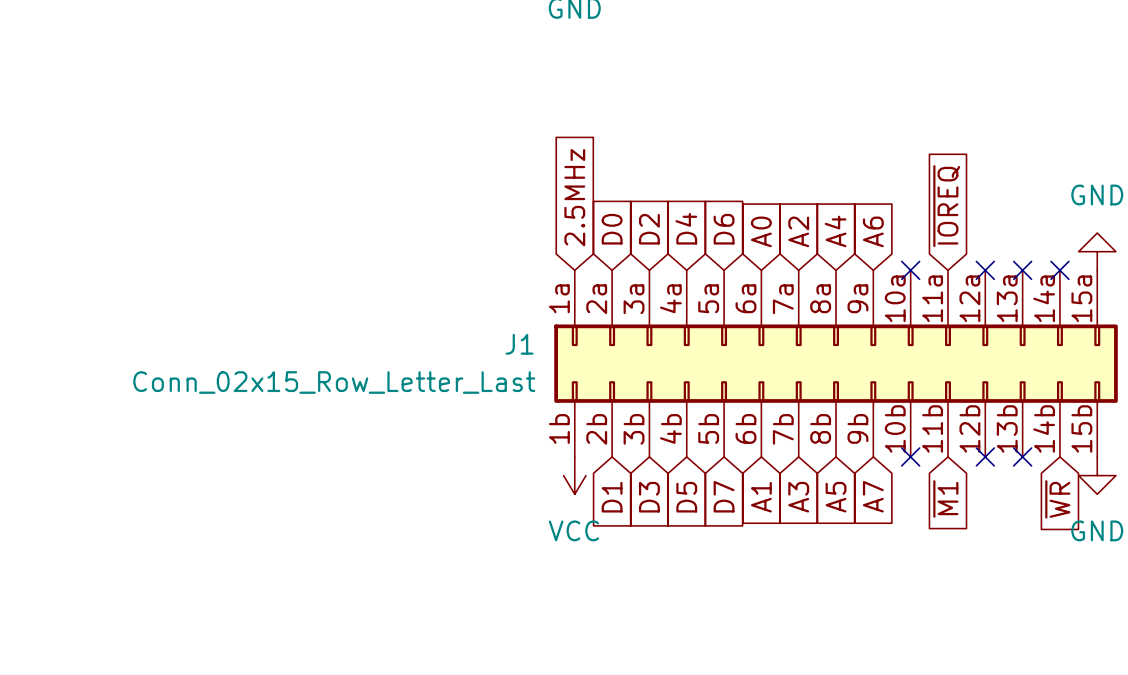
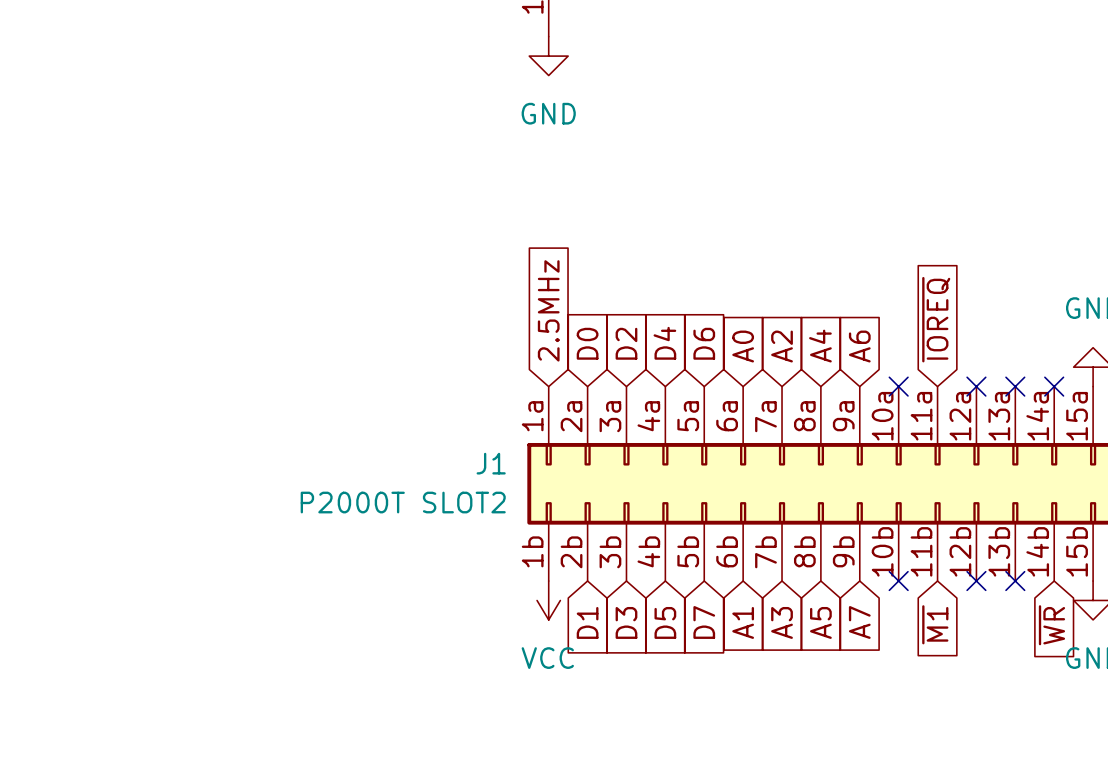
J1 value: Conn_02x15_Row_Letter_Last (334, 382) -> P2000T SLOT2 (403, 502)

